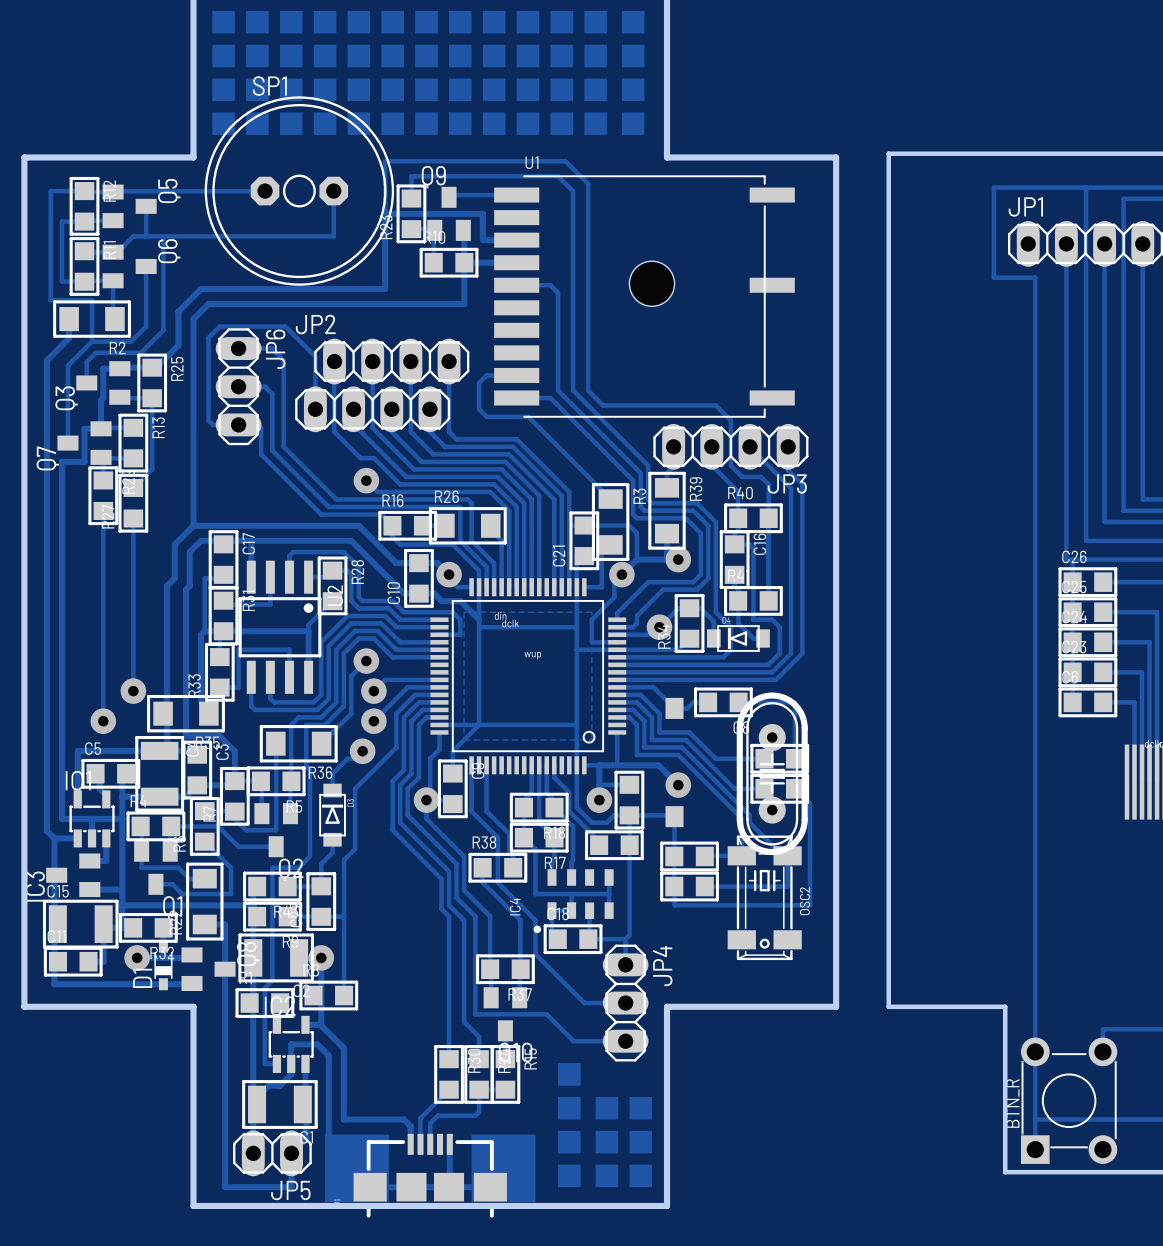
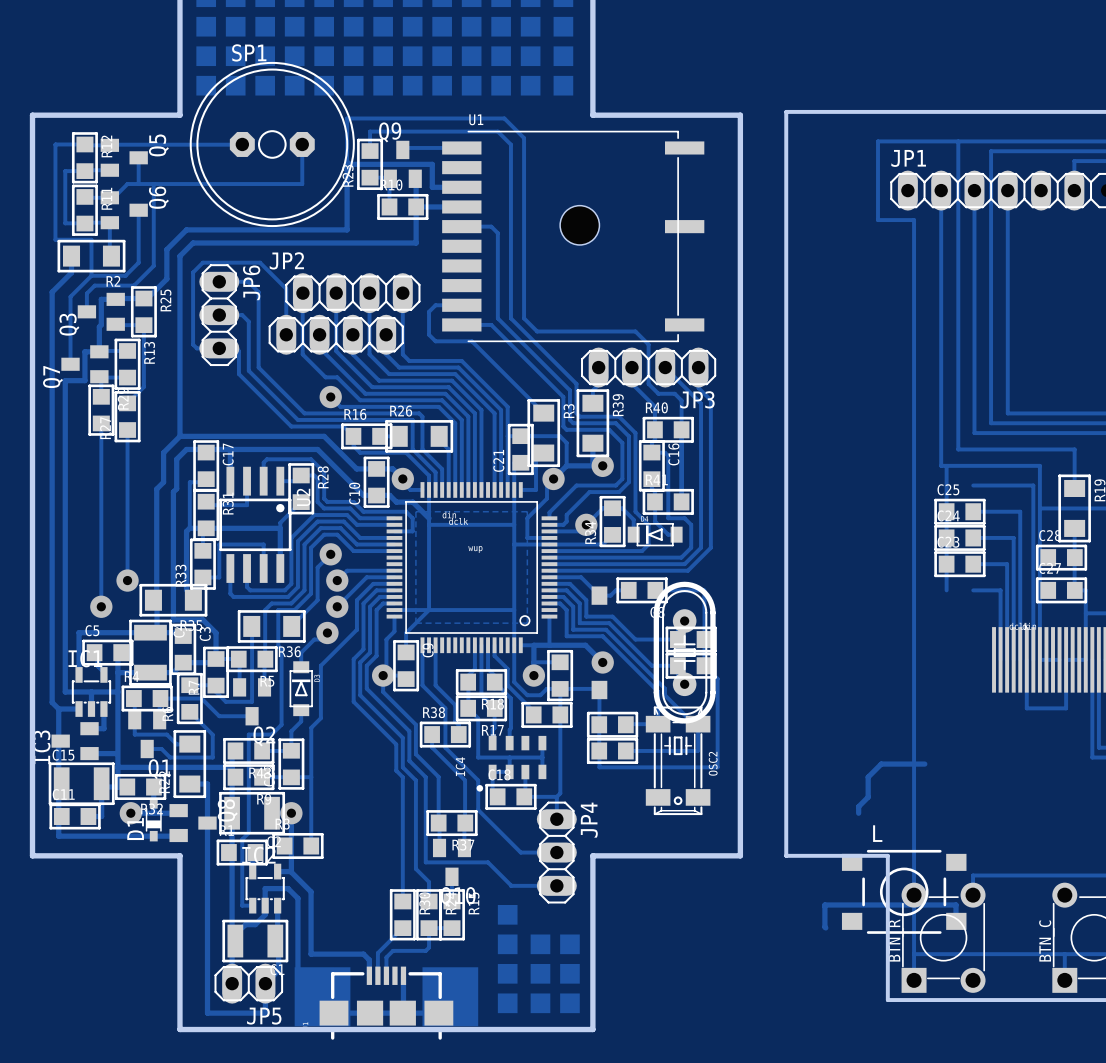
C26: (1087, 582) -> none
part: (1087, 702) -> none
track: none -> (924, 764) (881, 764) (868, 777) (868, 797) (858, 806) (858, 813)
L: none -> (904, 891)
track: none -> (956, 921) (956, 904) (824, 904) (825, 927)

